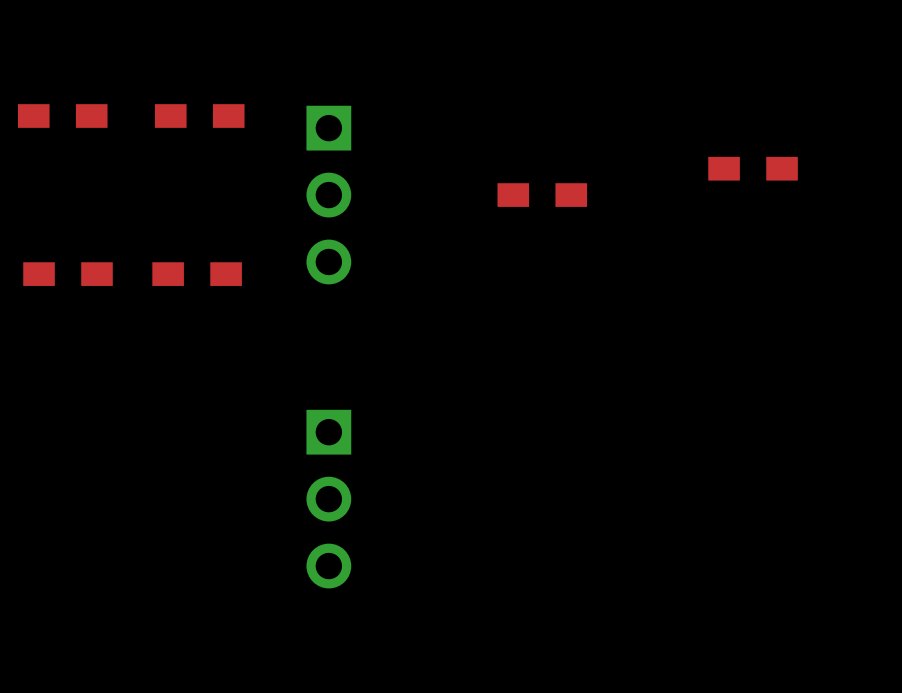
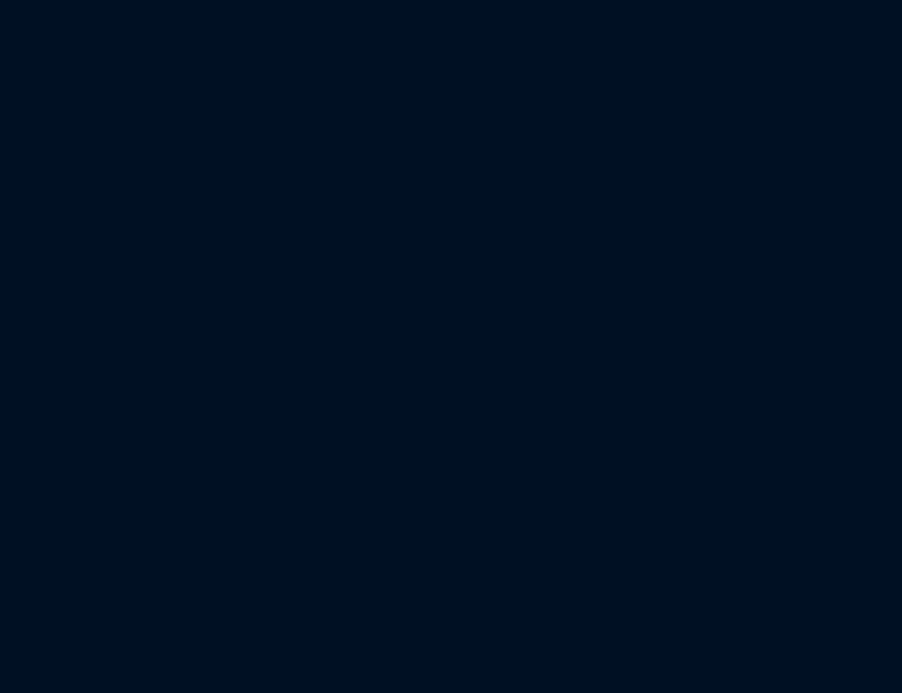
part: (62, 116) -> none
part: (199, 116) -> none
part: (753, 168) -> none
part: (328, 195) -> none
part: (542, 195) -> none
part: (68, 274) -> none
part: (197, 274) -> none
part: (328, 499) -> none

